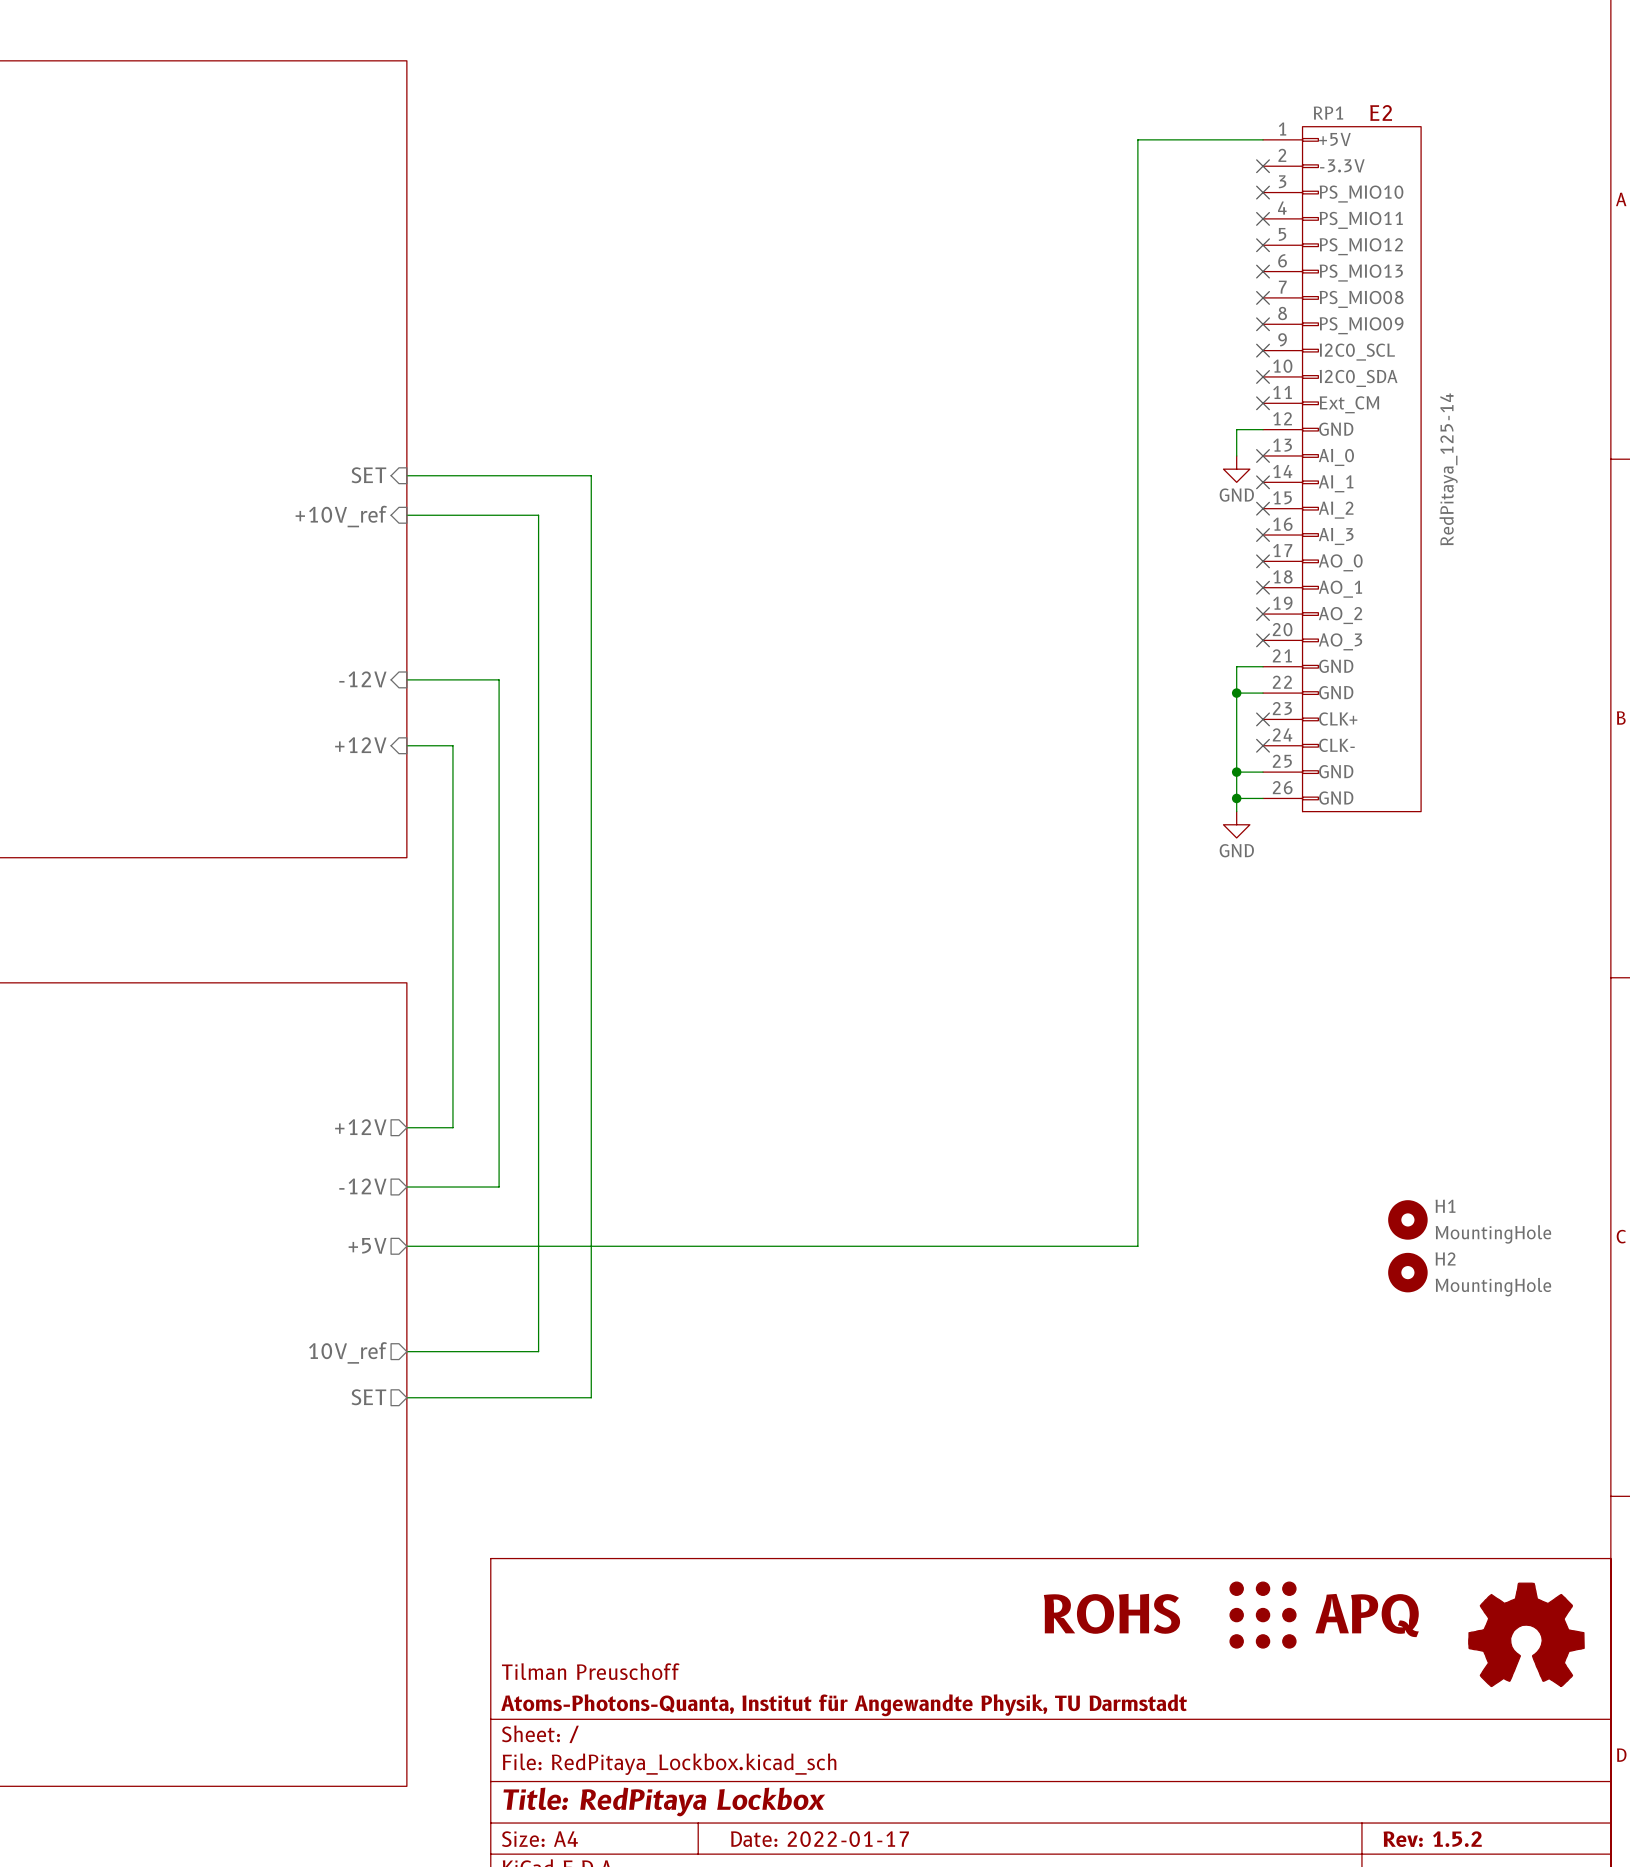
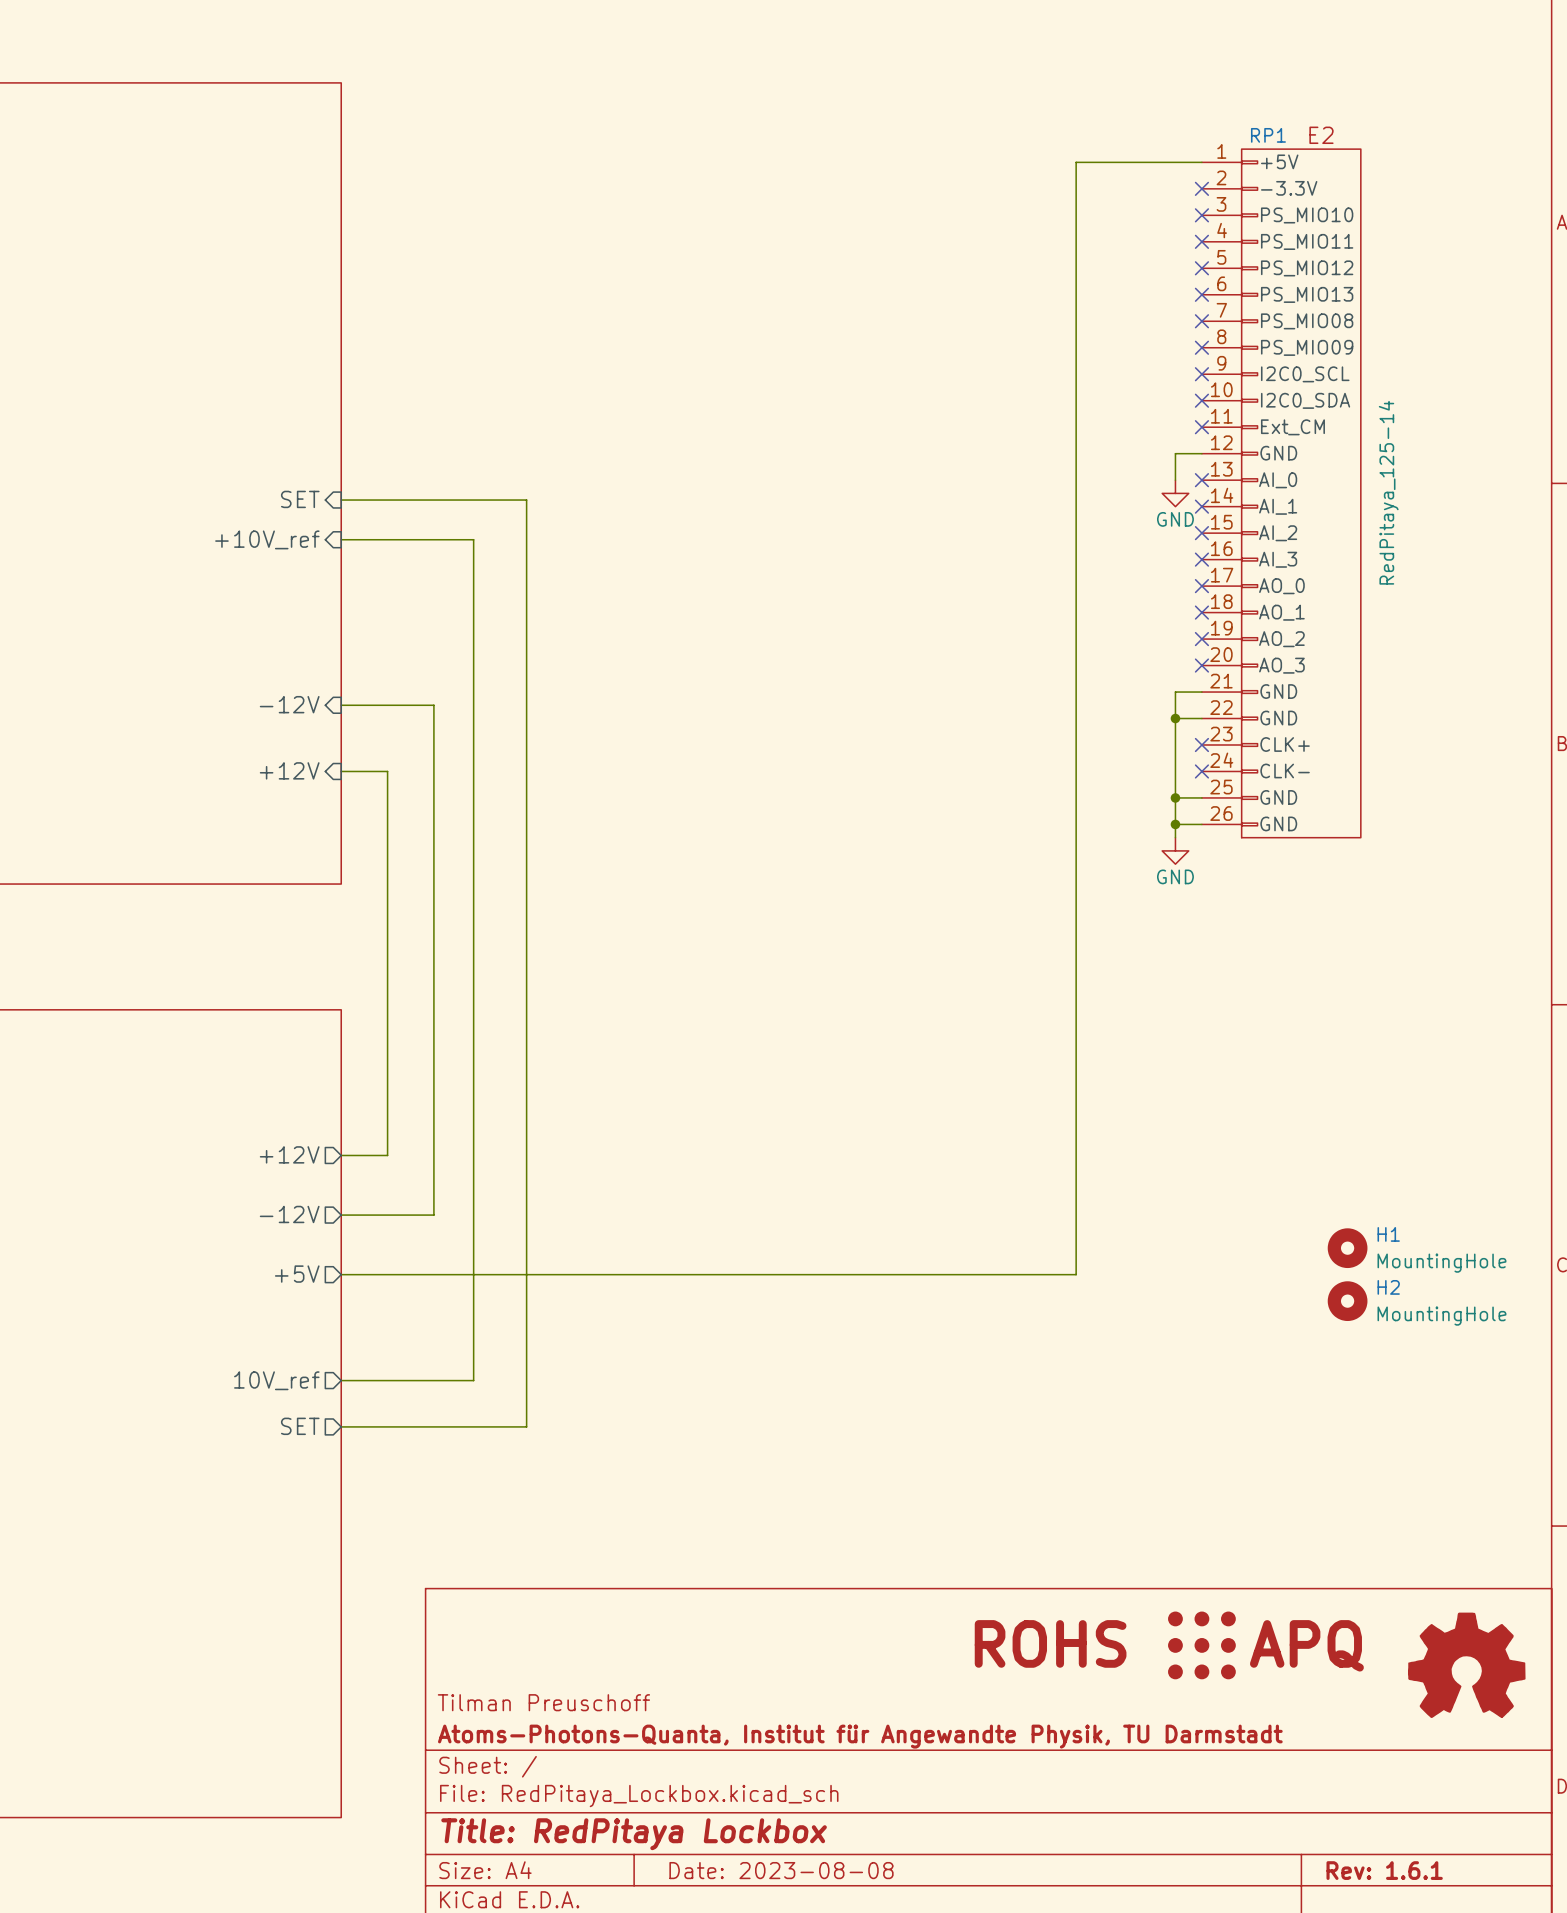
title block: Date: 2022-01-17 (820, 1839) -> Date: 2023-08-08 (781, 1870)
title block: Rev: 1.5.2 (1432, 1839) -> Rev: 1.6.1 (1384, 1870)

